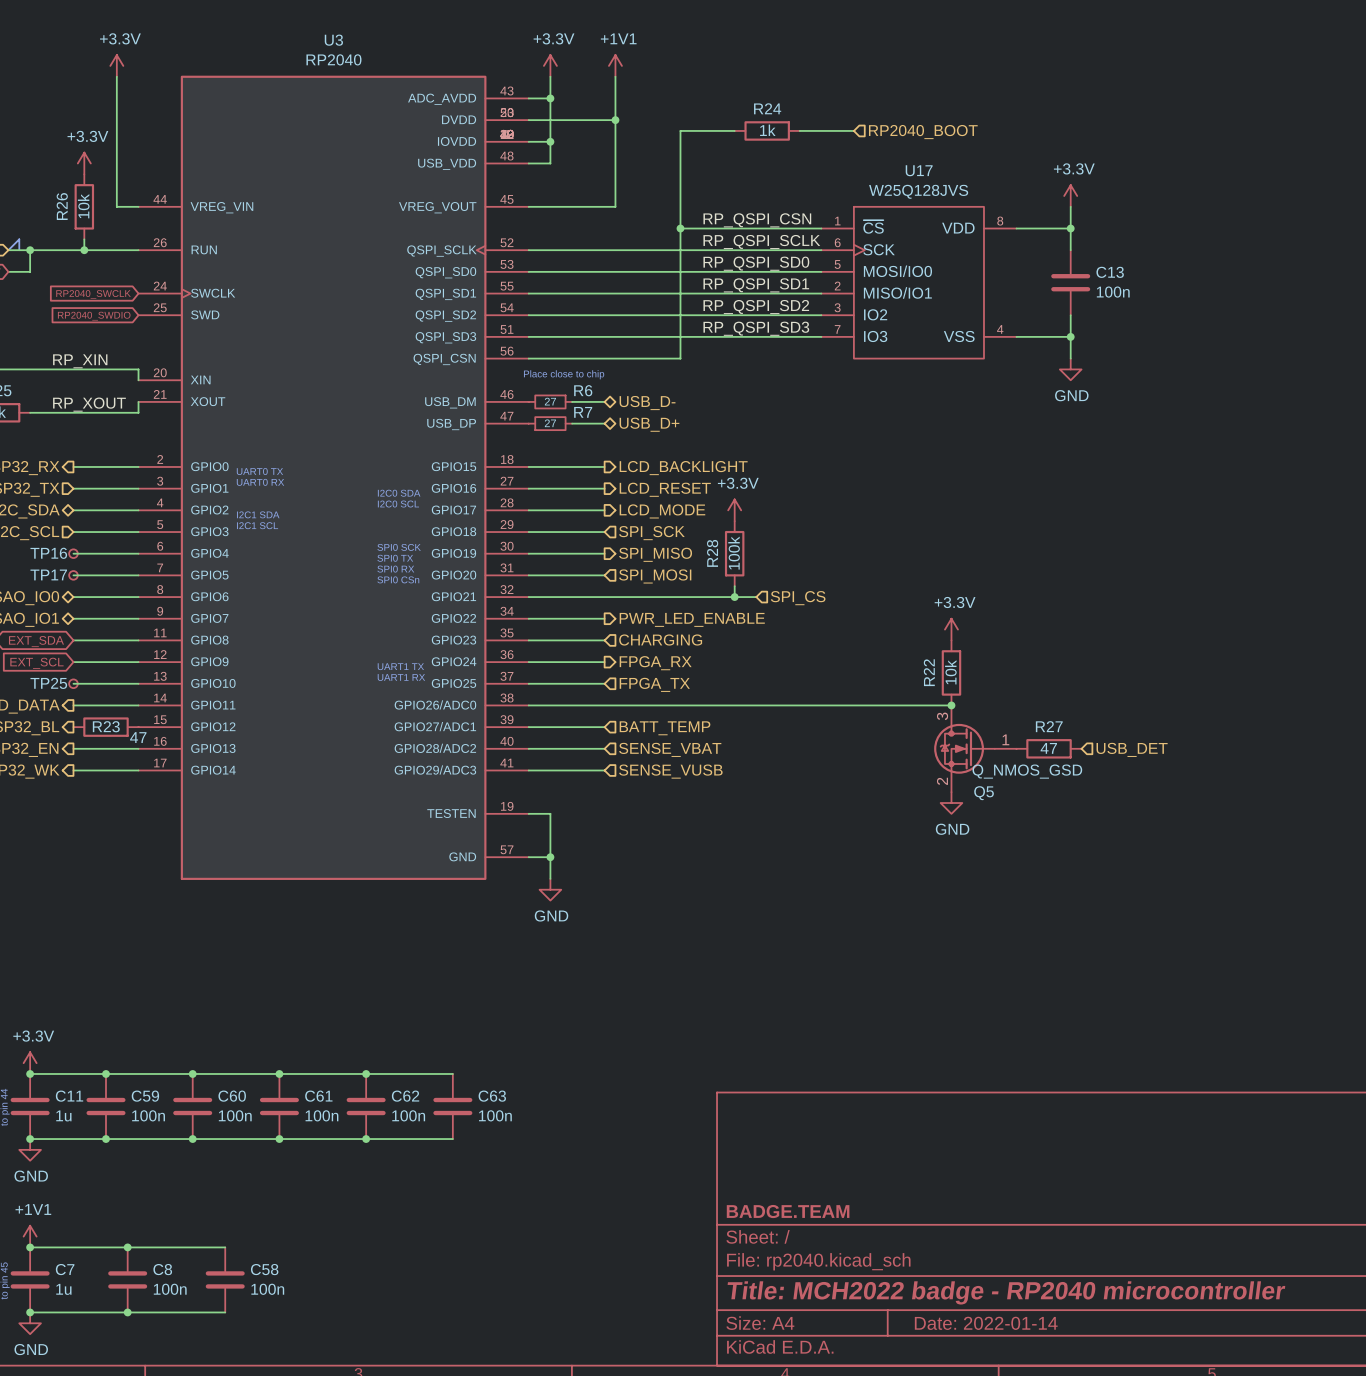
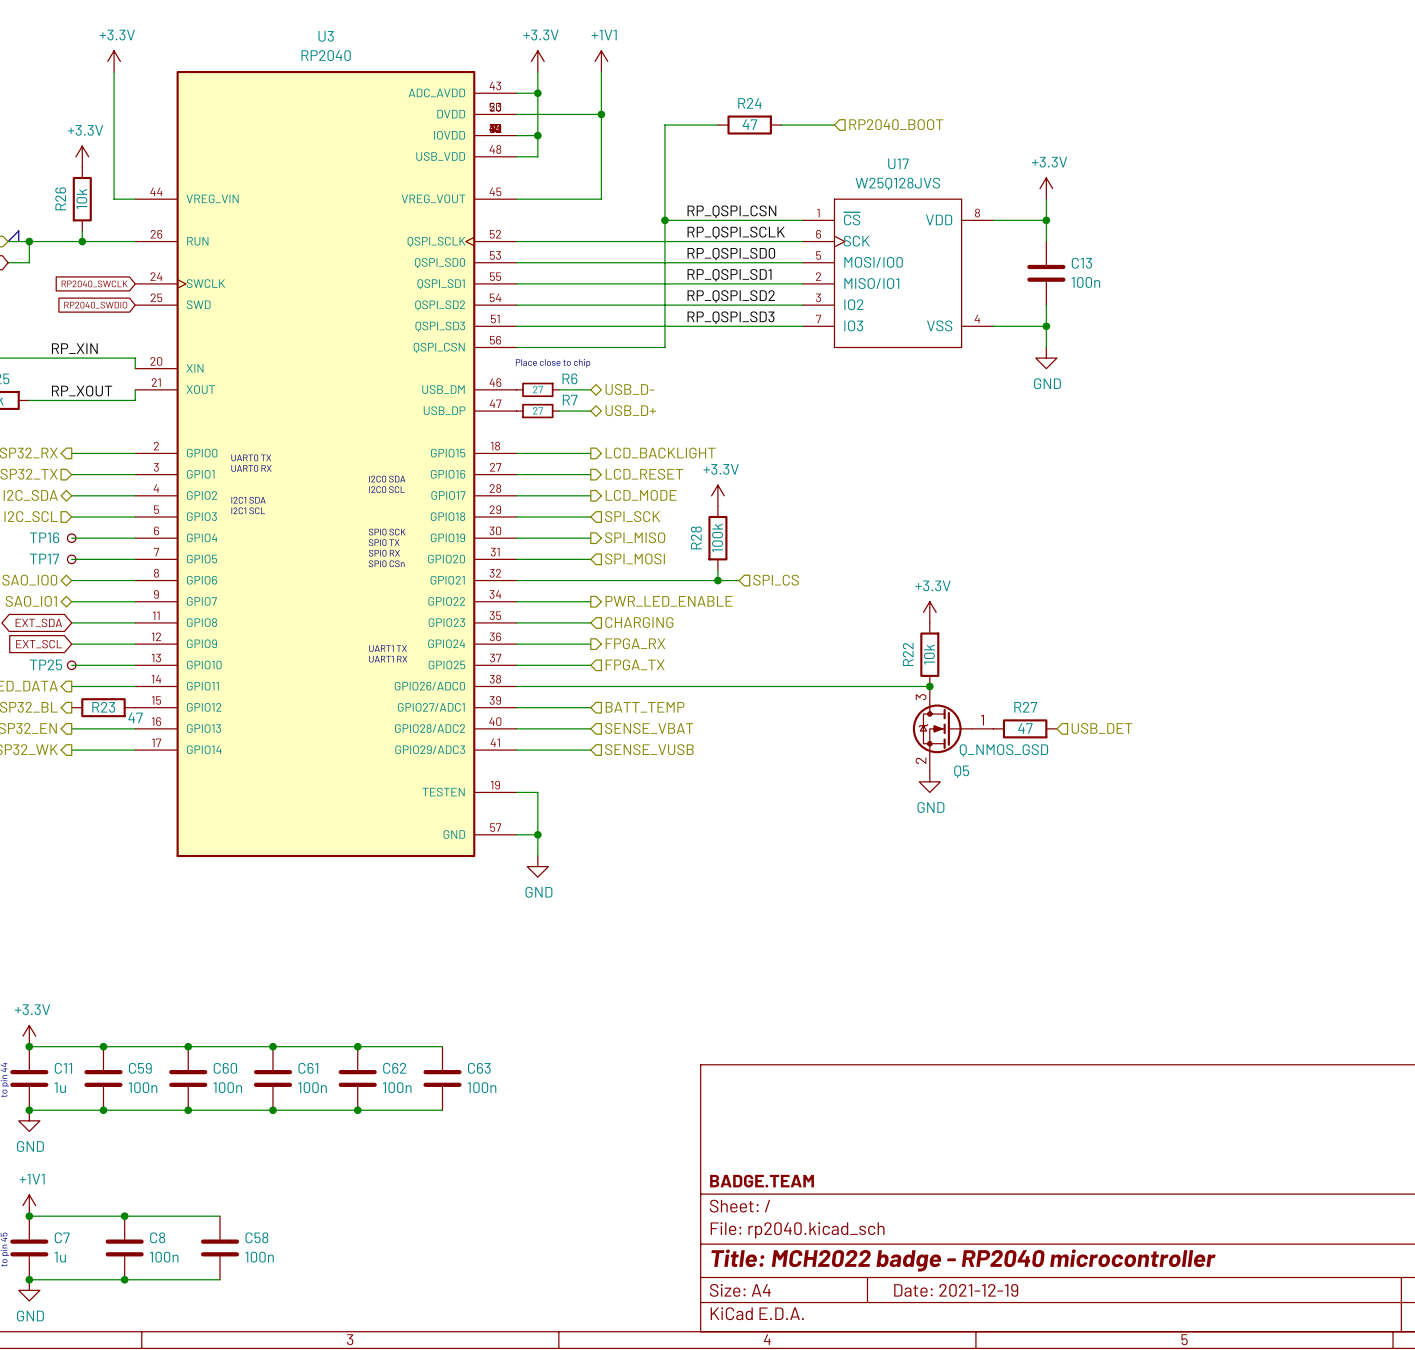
R24 value: 1k (767, 130) -> 47 (749, 124)
title block: Date: 2022-01-14 (986, 1323) -> Date: 2021-12-19 (956, 1290)

